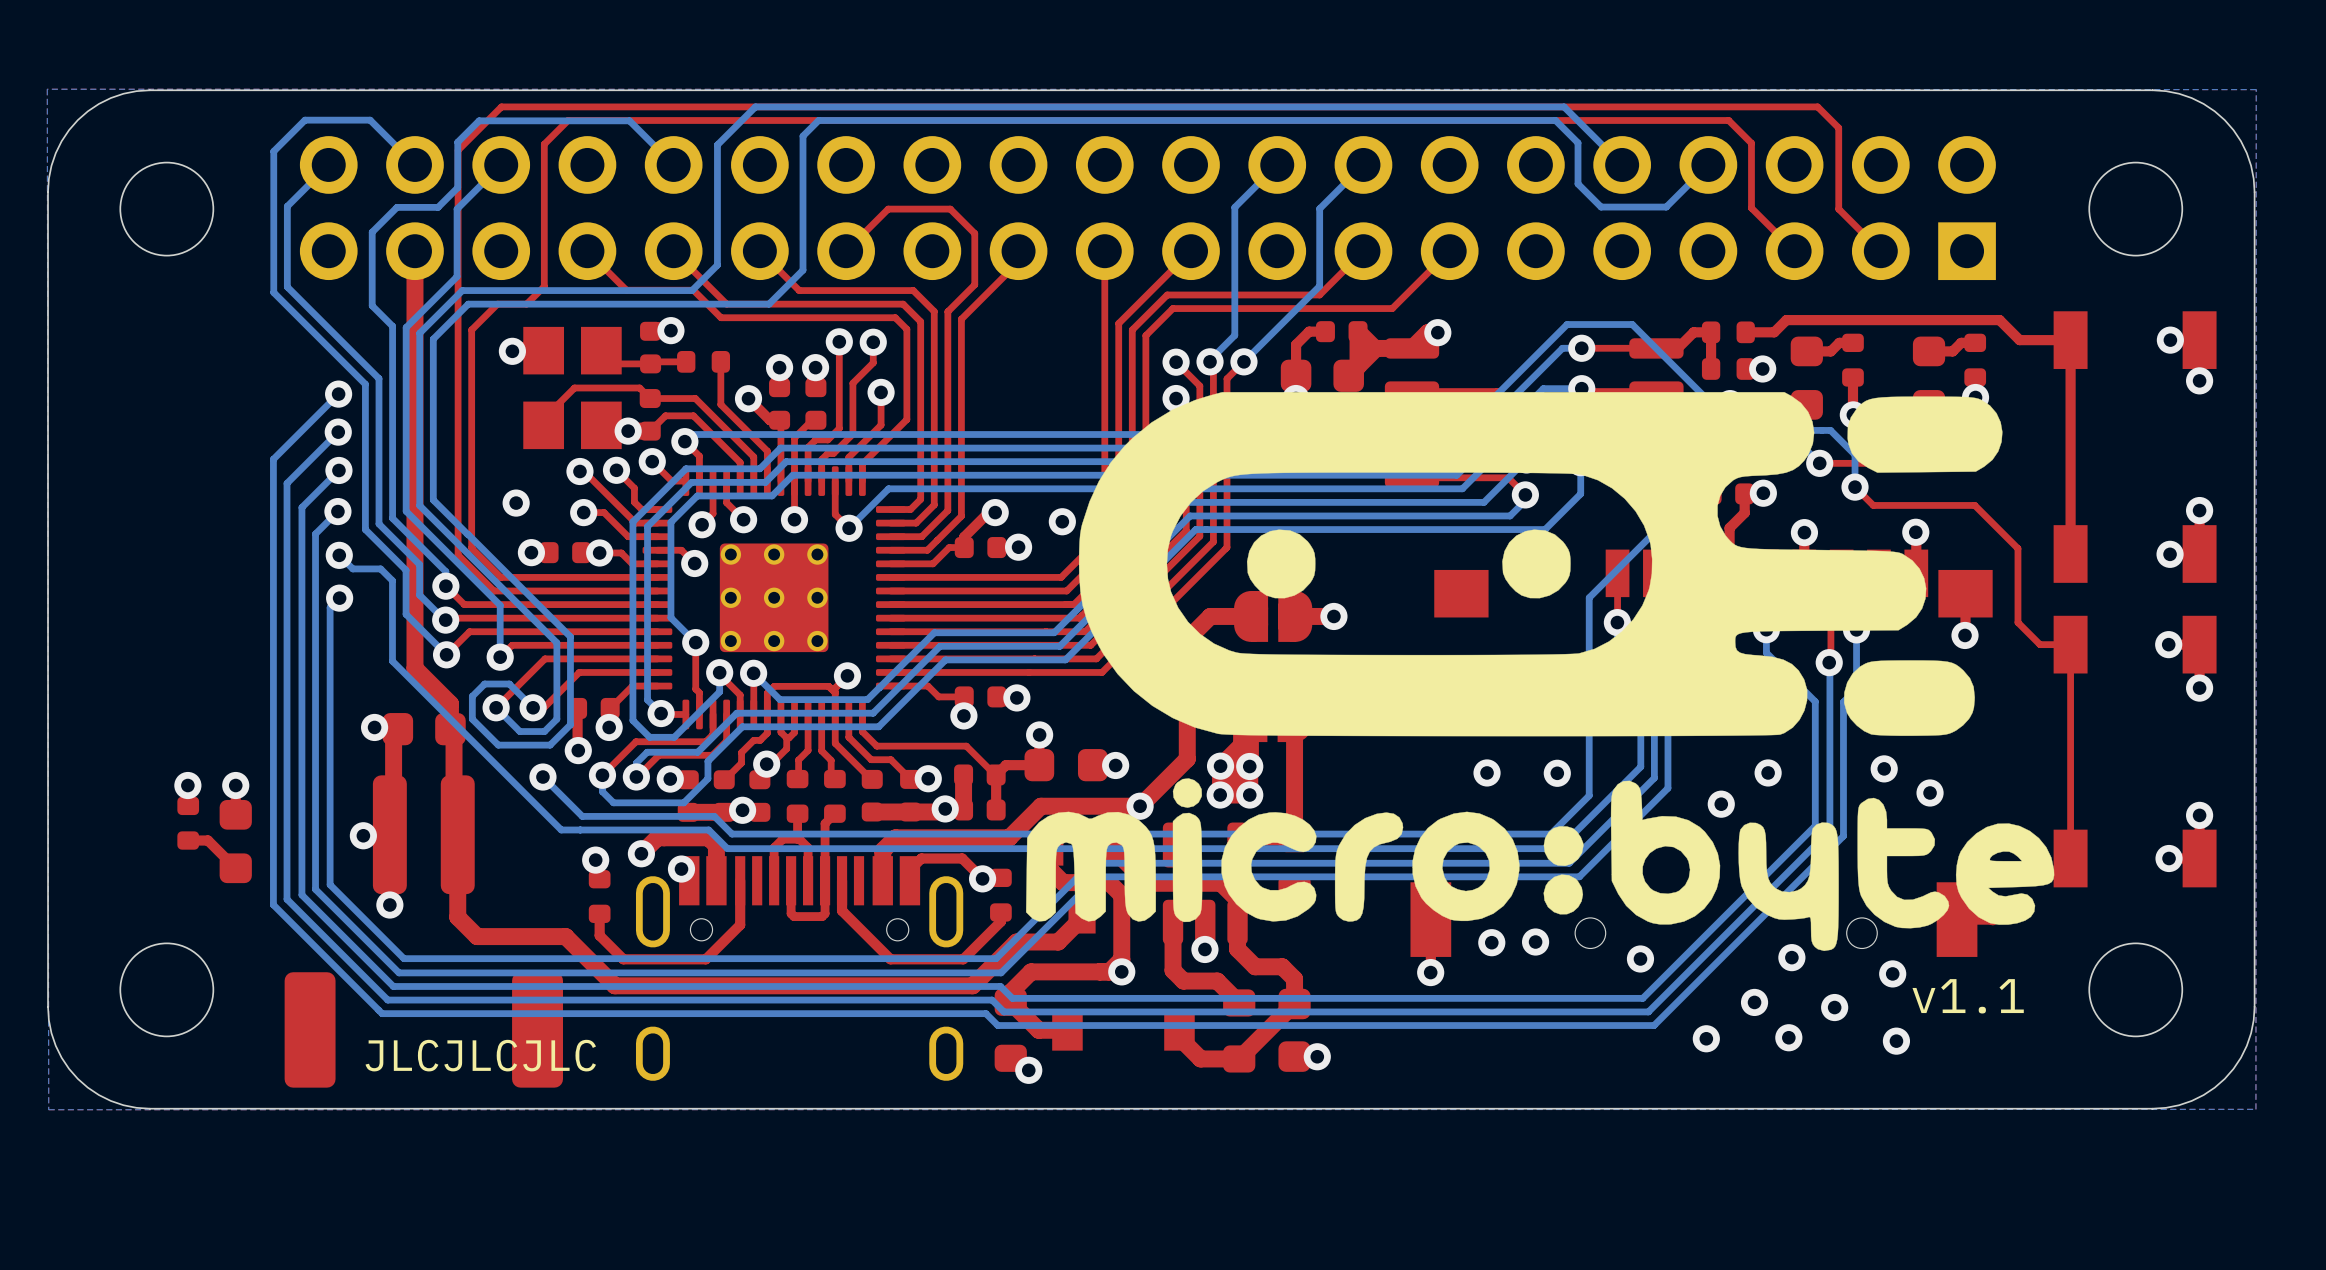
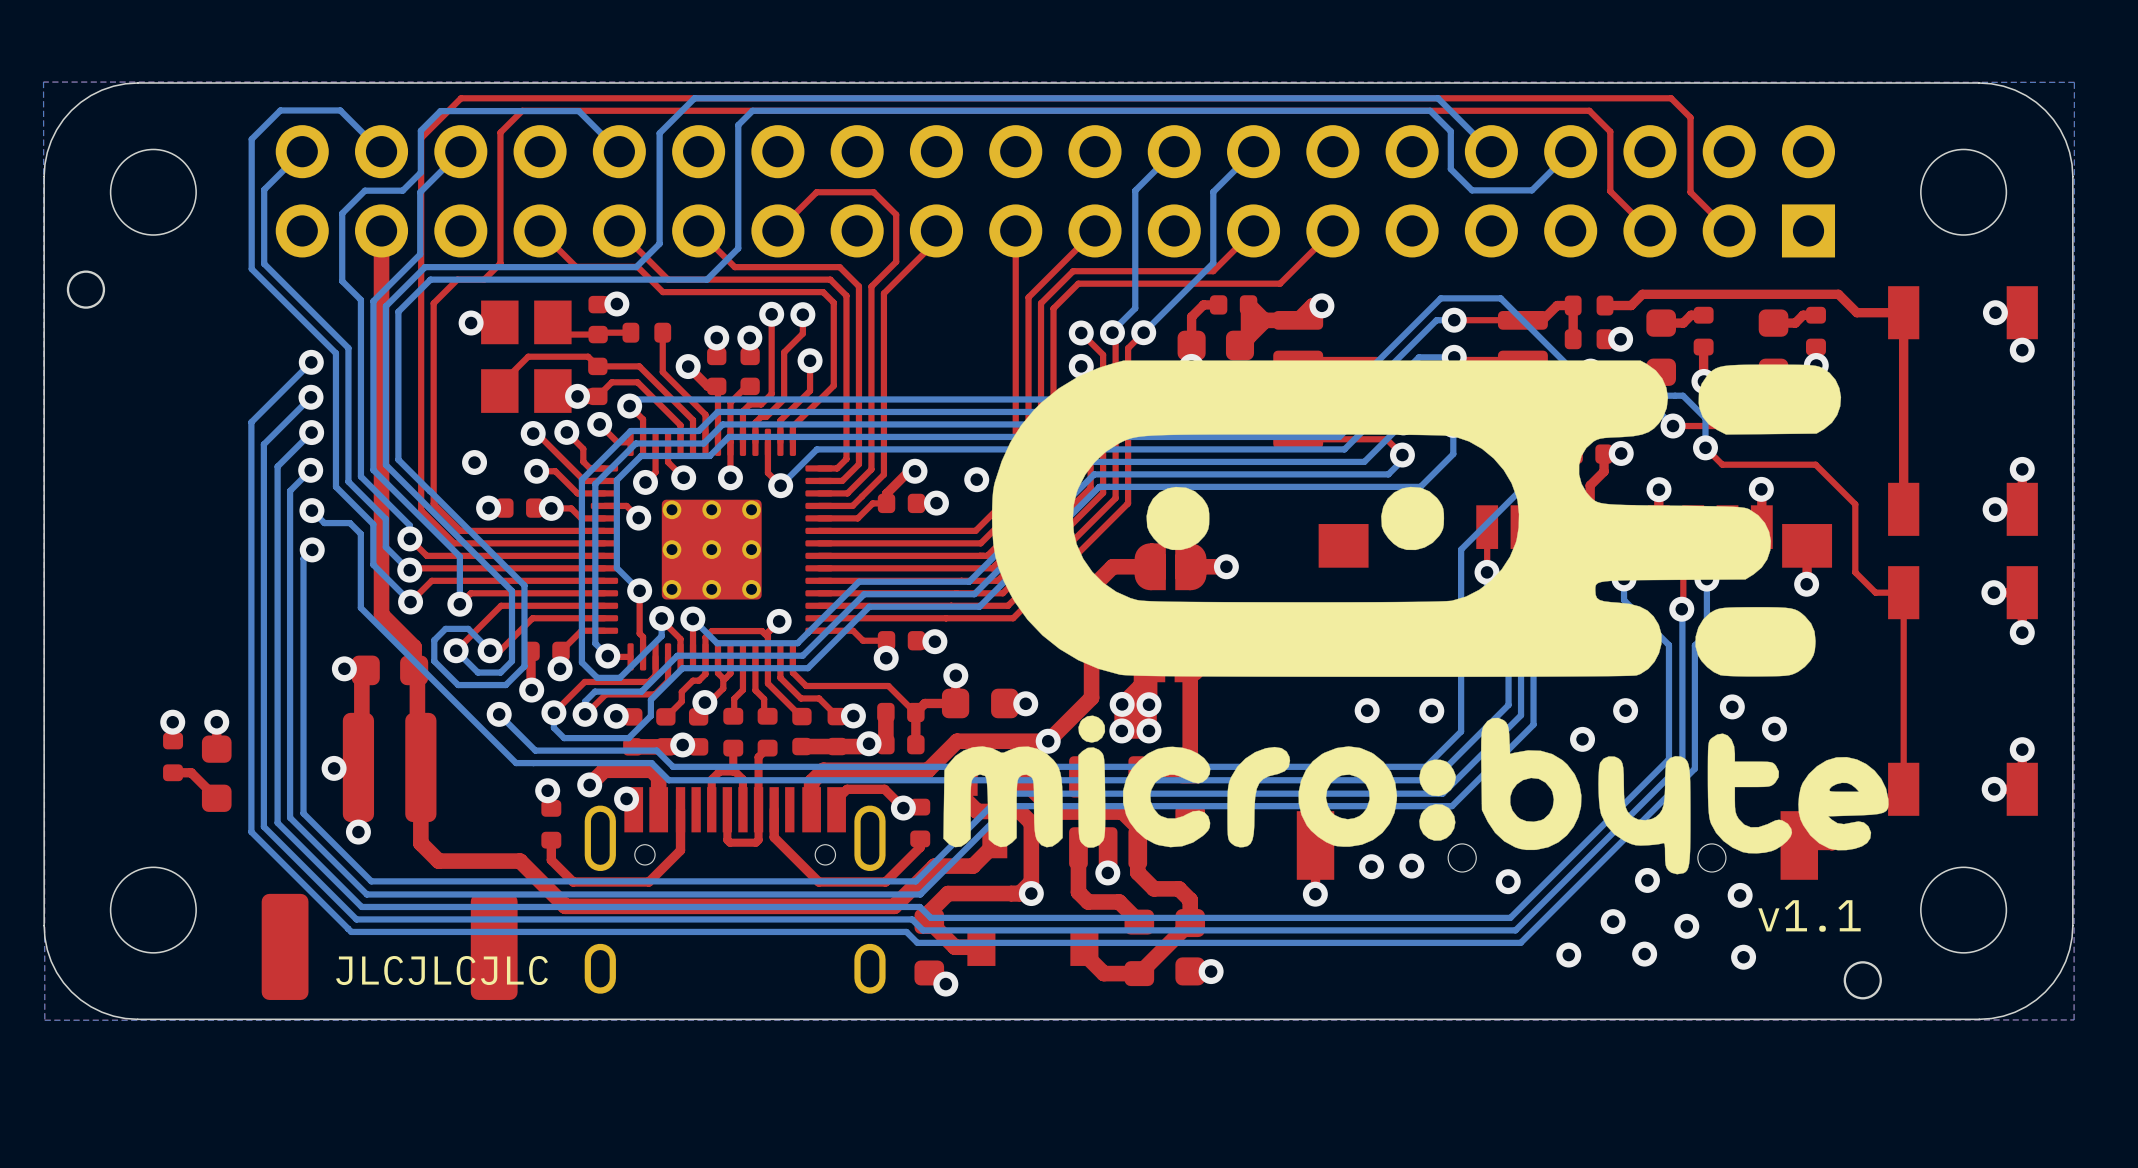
round board edge: none -> [66, 270, 106, 309]
round board edge: none -> [1843, 961, 1882, 1000]

